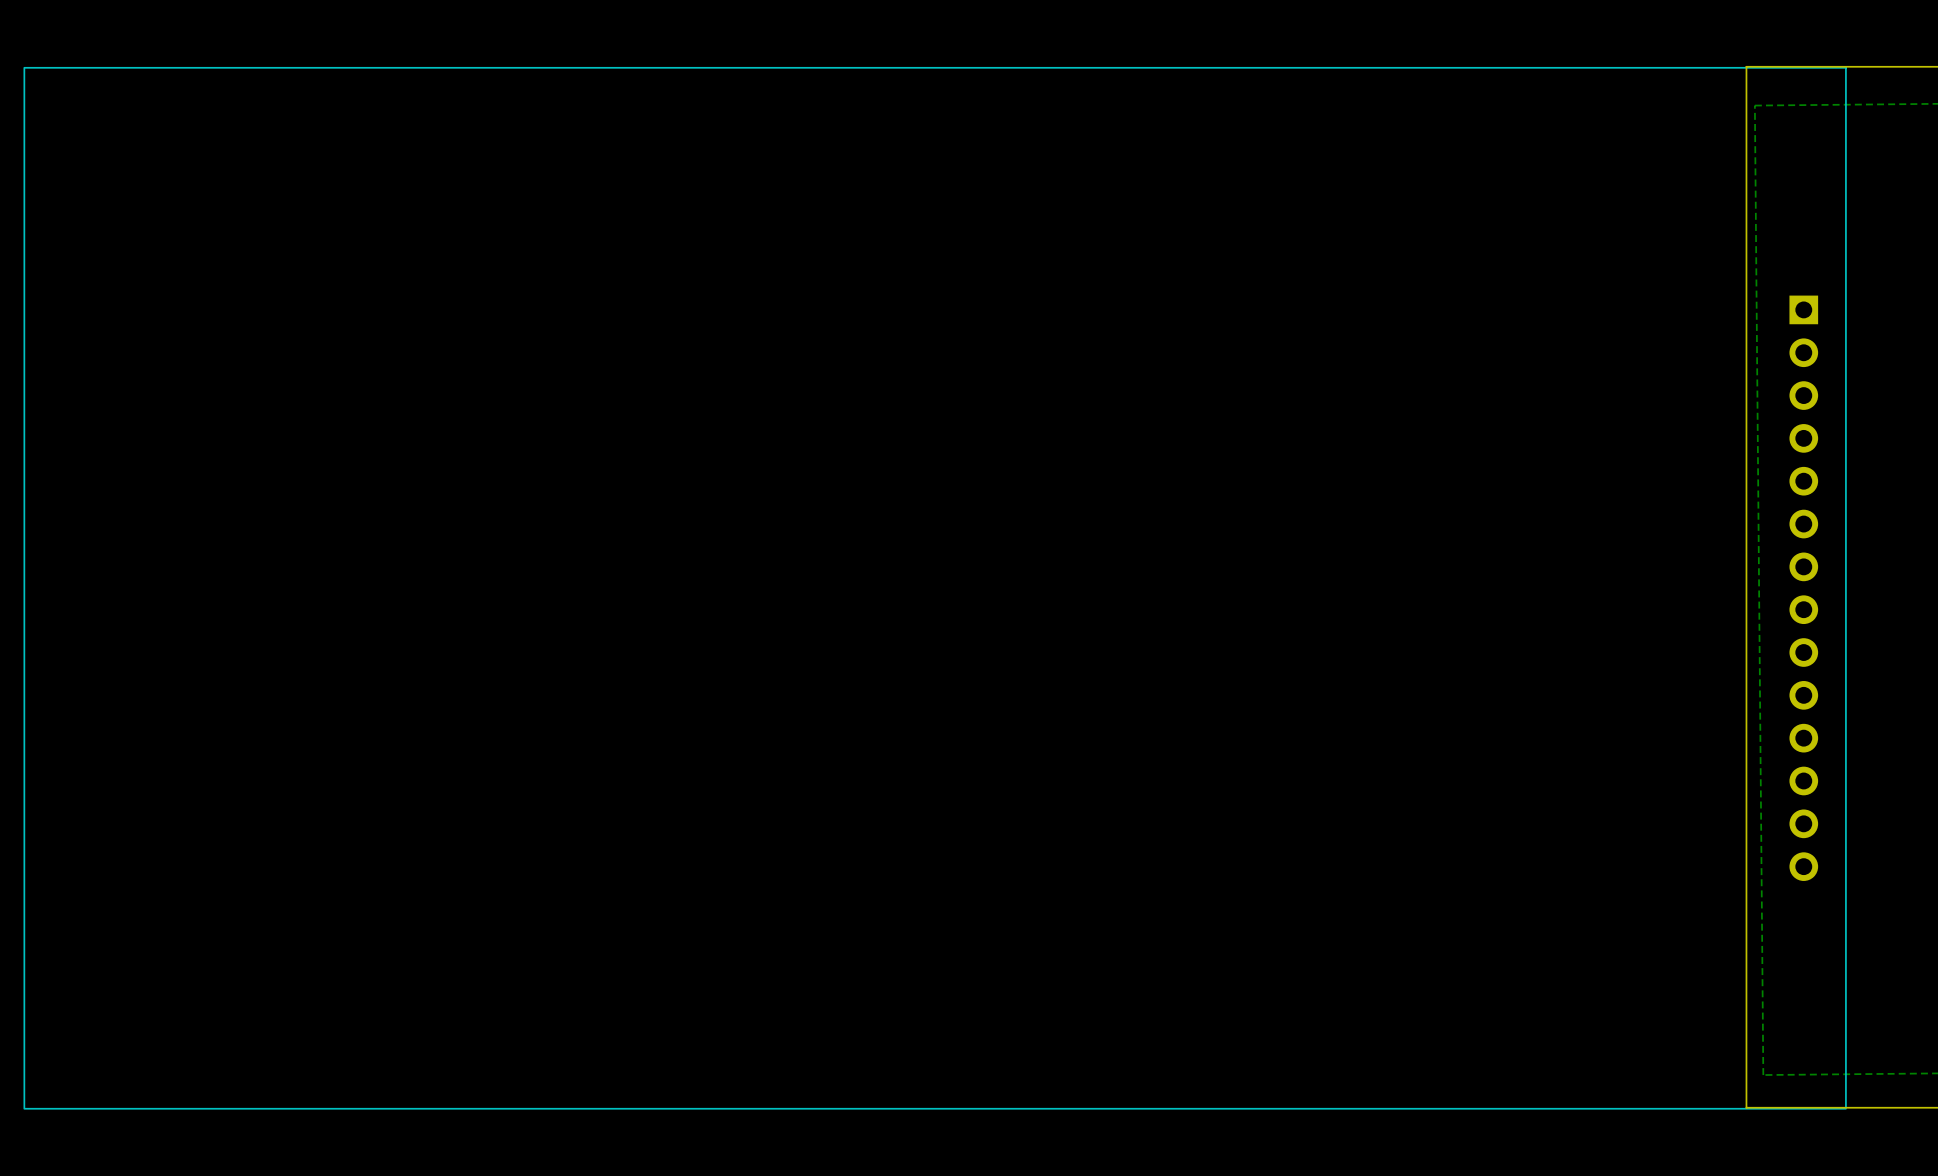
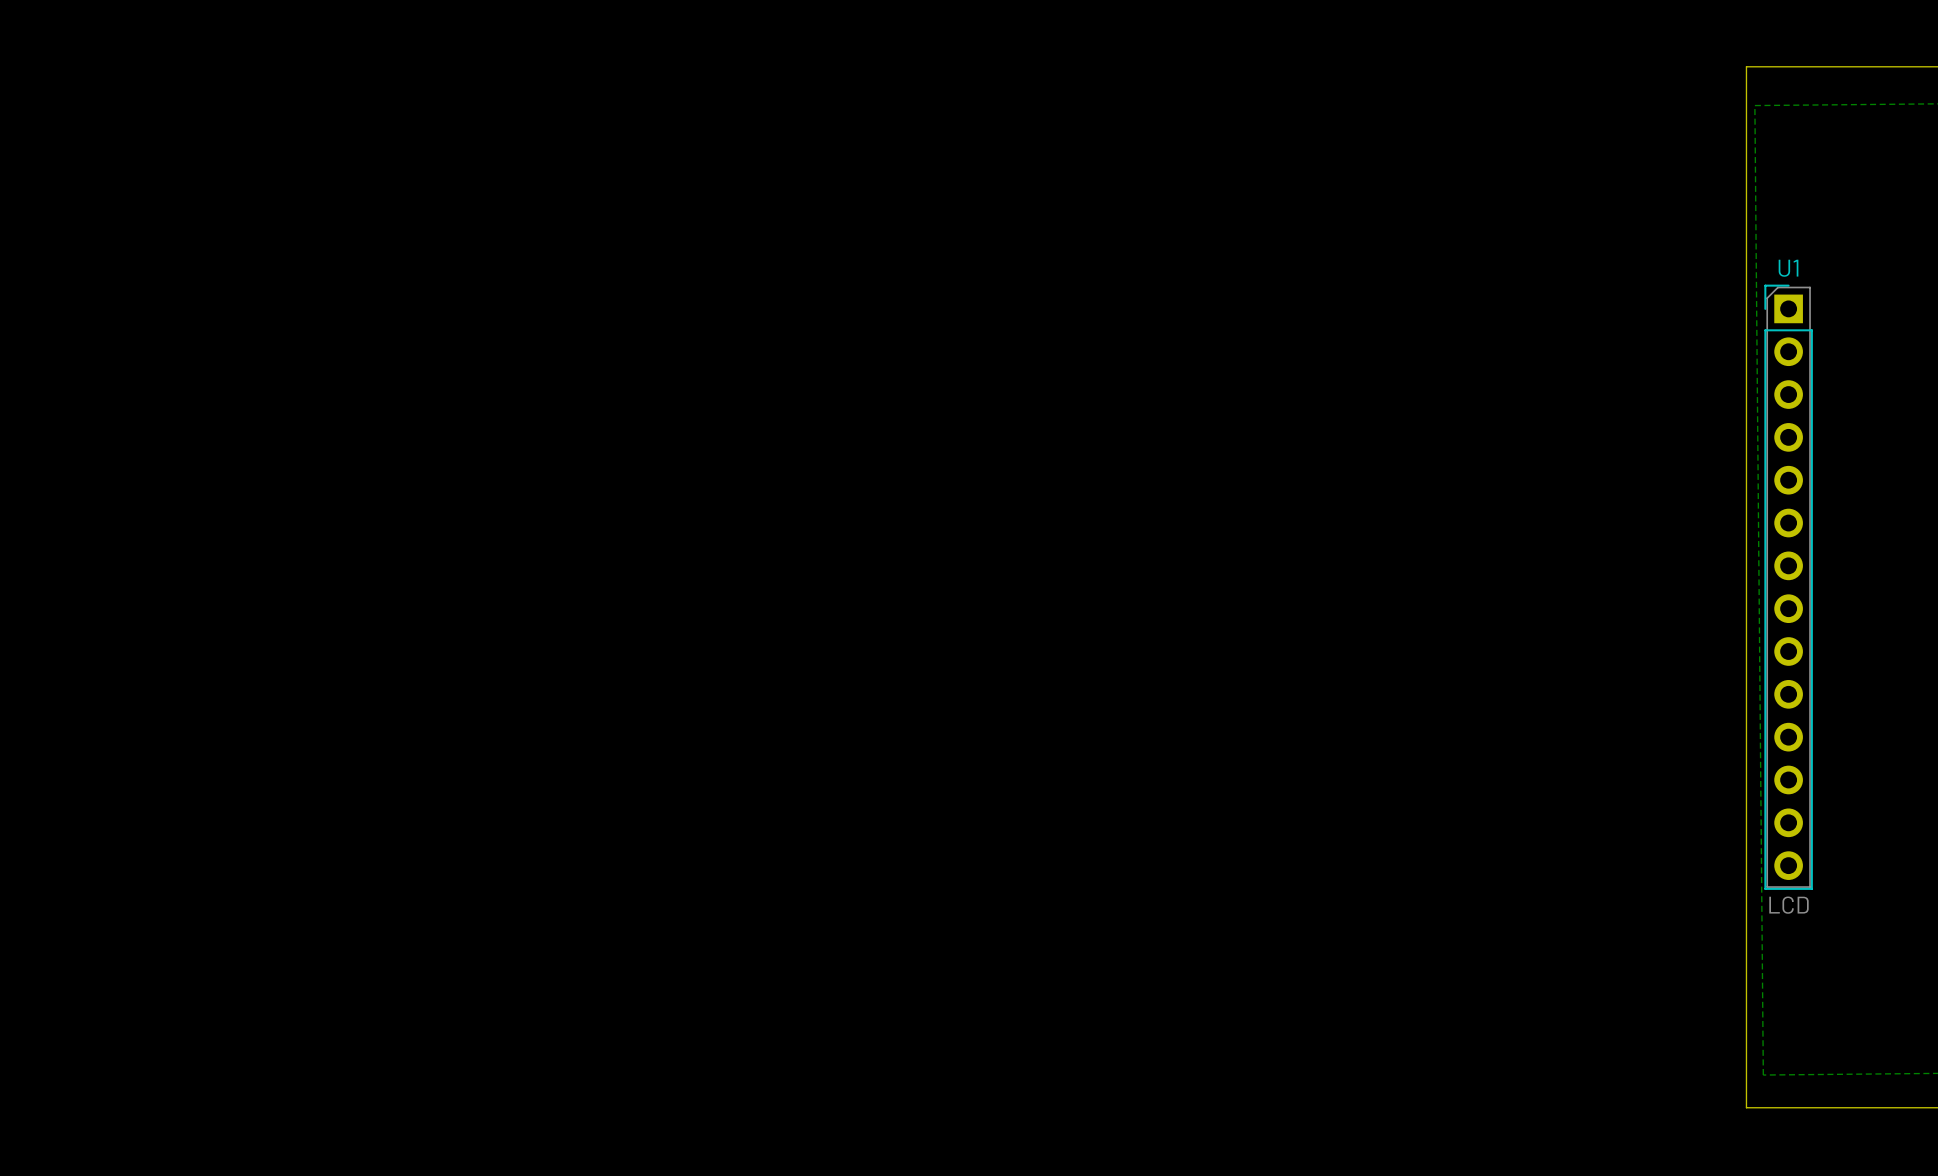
U1: none -> LCD (1788, 587)
part: (935, 588) -> none

